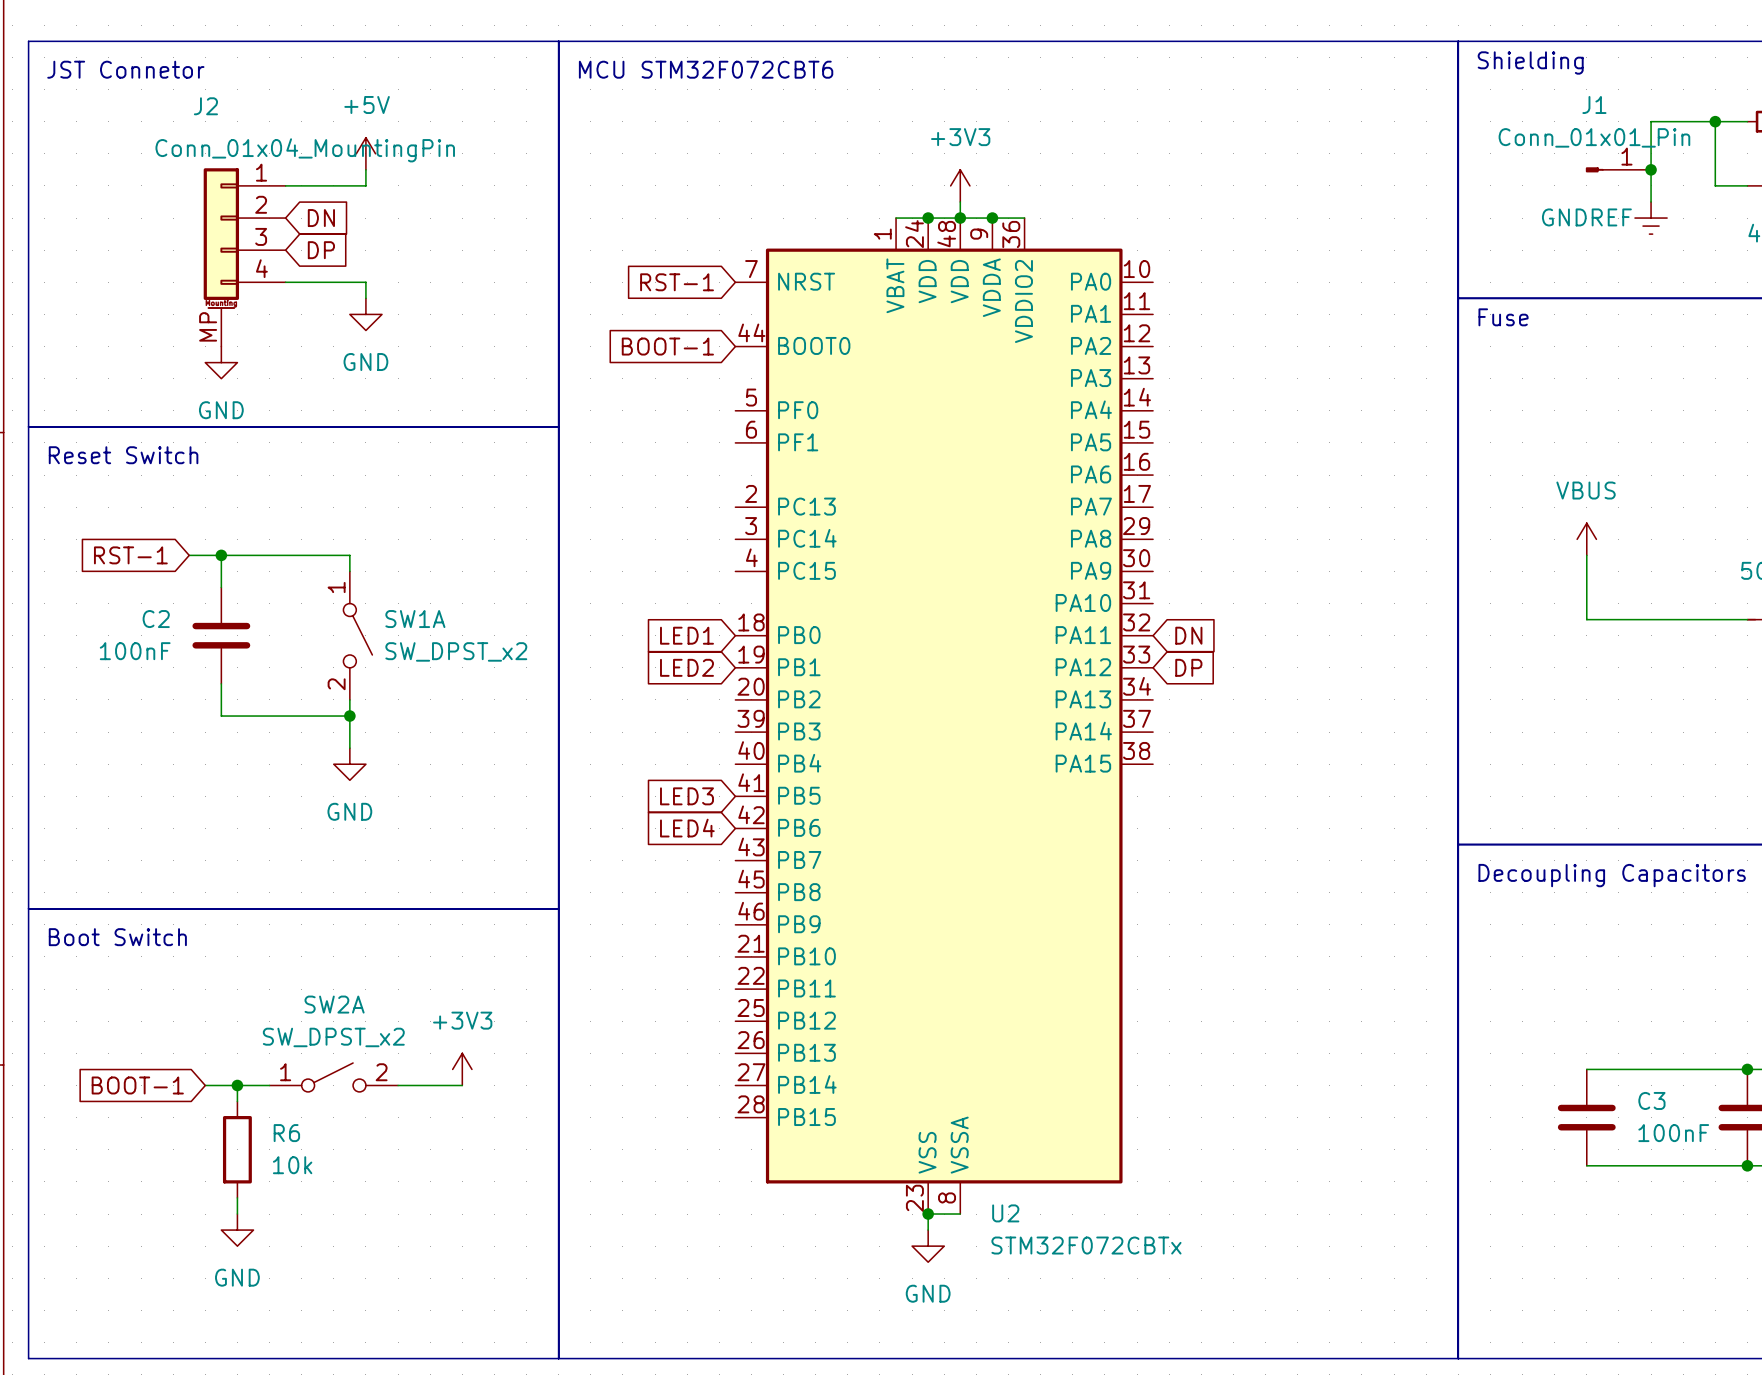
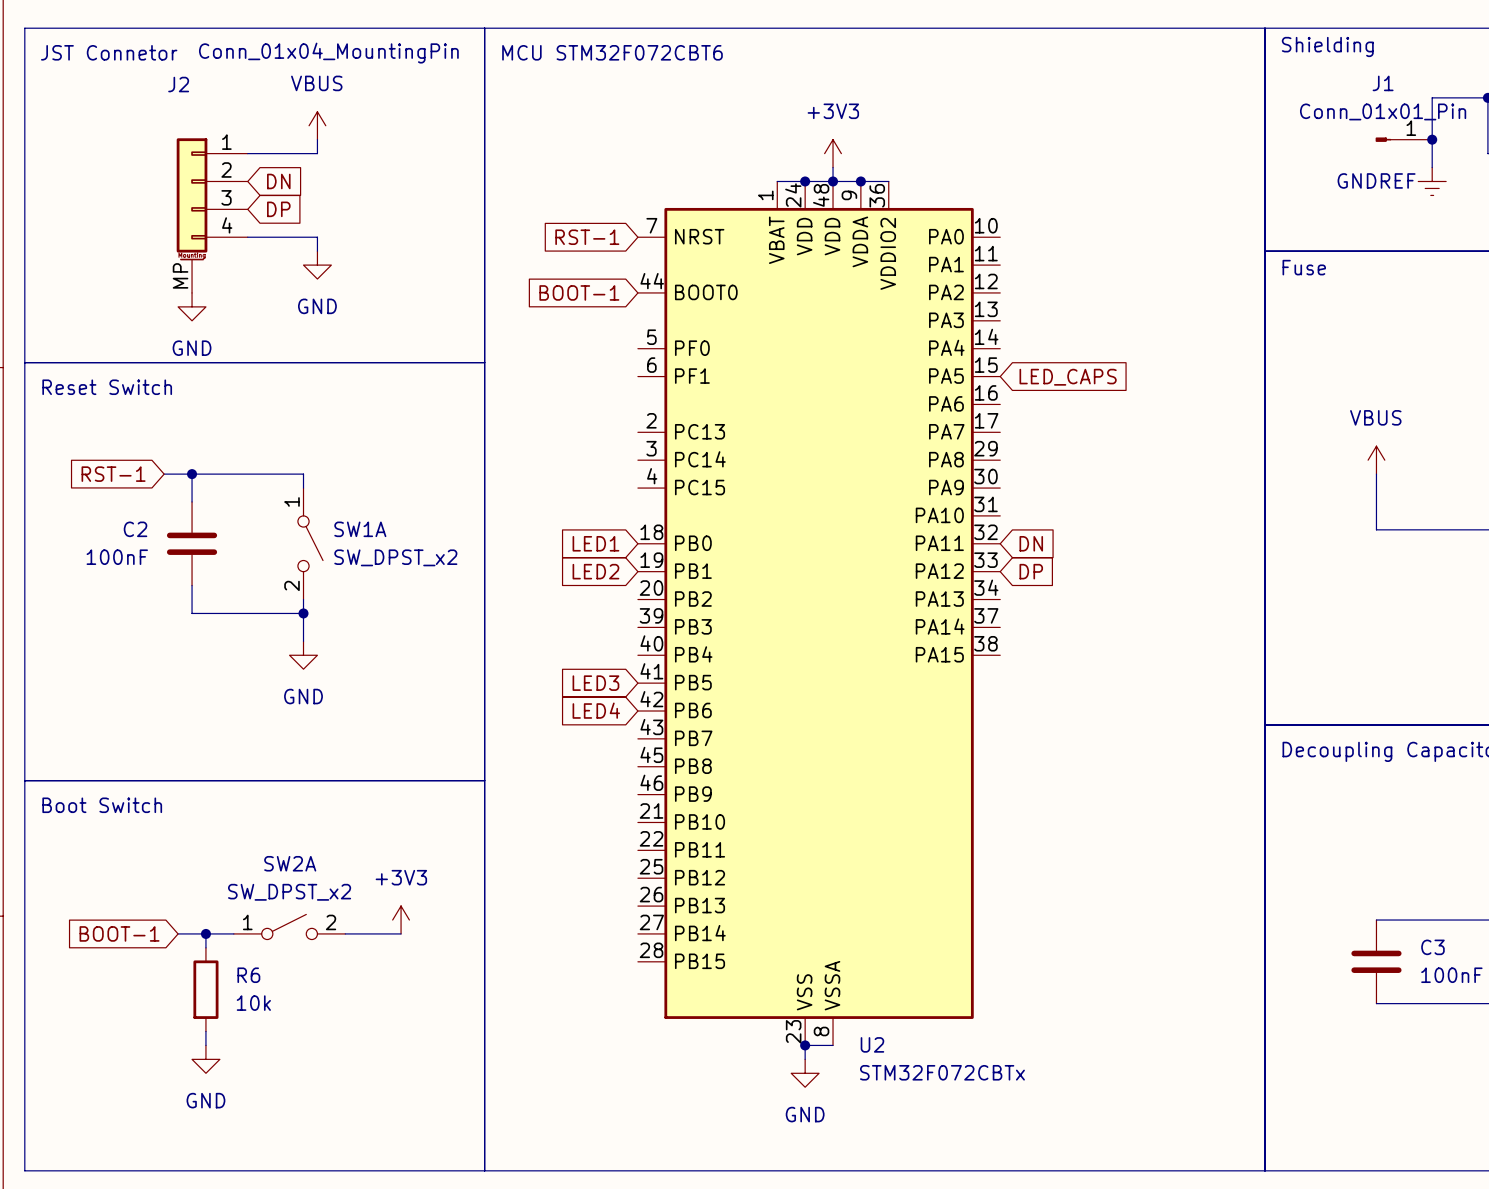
J2 value position: Conn_01x04_MountingPin (305, 150) -> Conn_01x04_MountingPin (328, 53)
power symbol: +5V (365, 153) -> VBUS (317, 125)
global label: none -> LED_CAPS (1068, 377)

